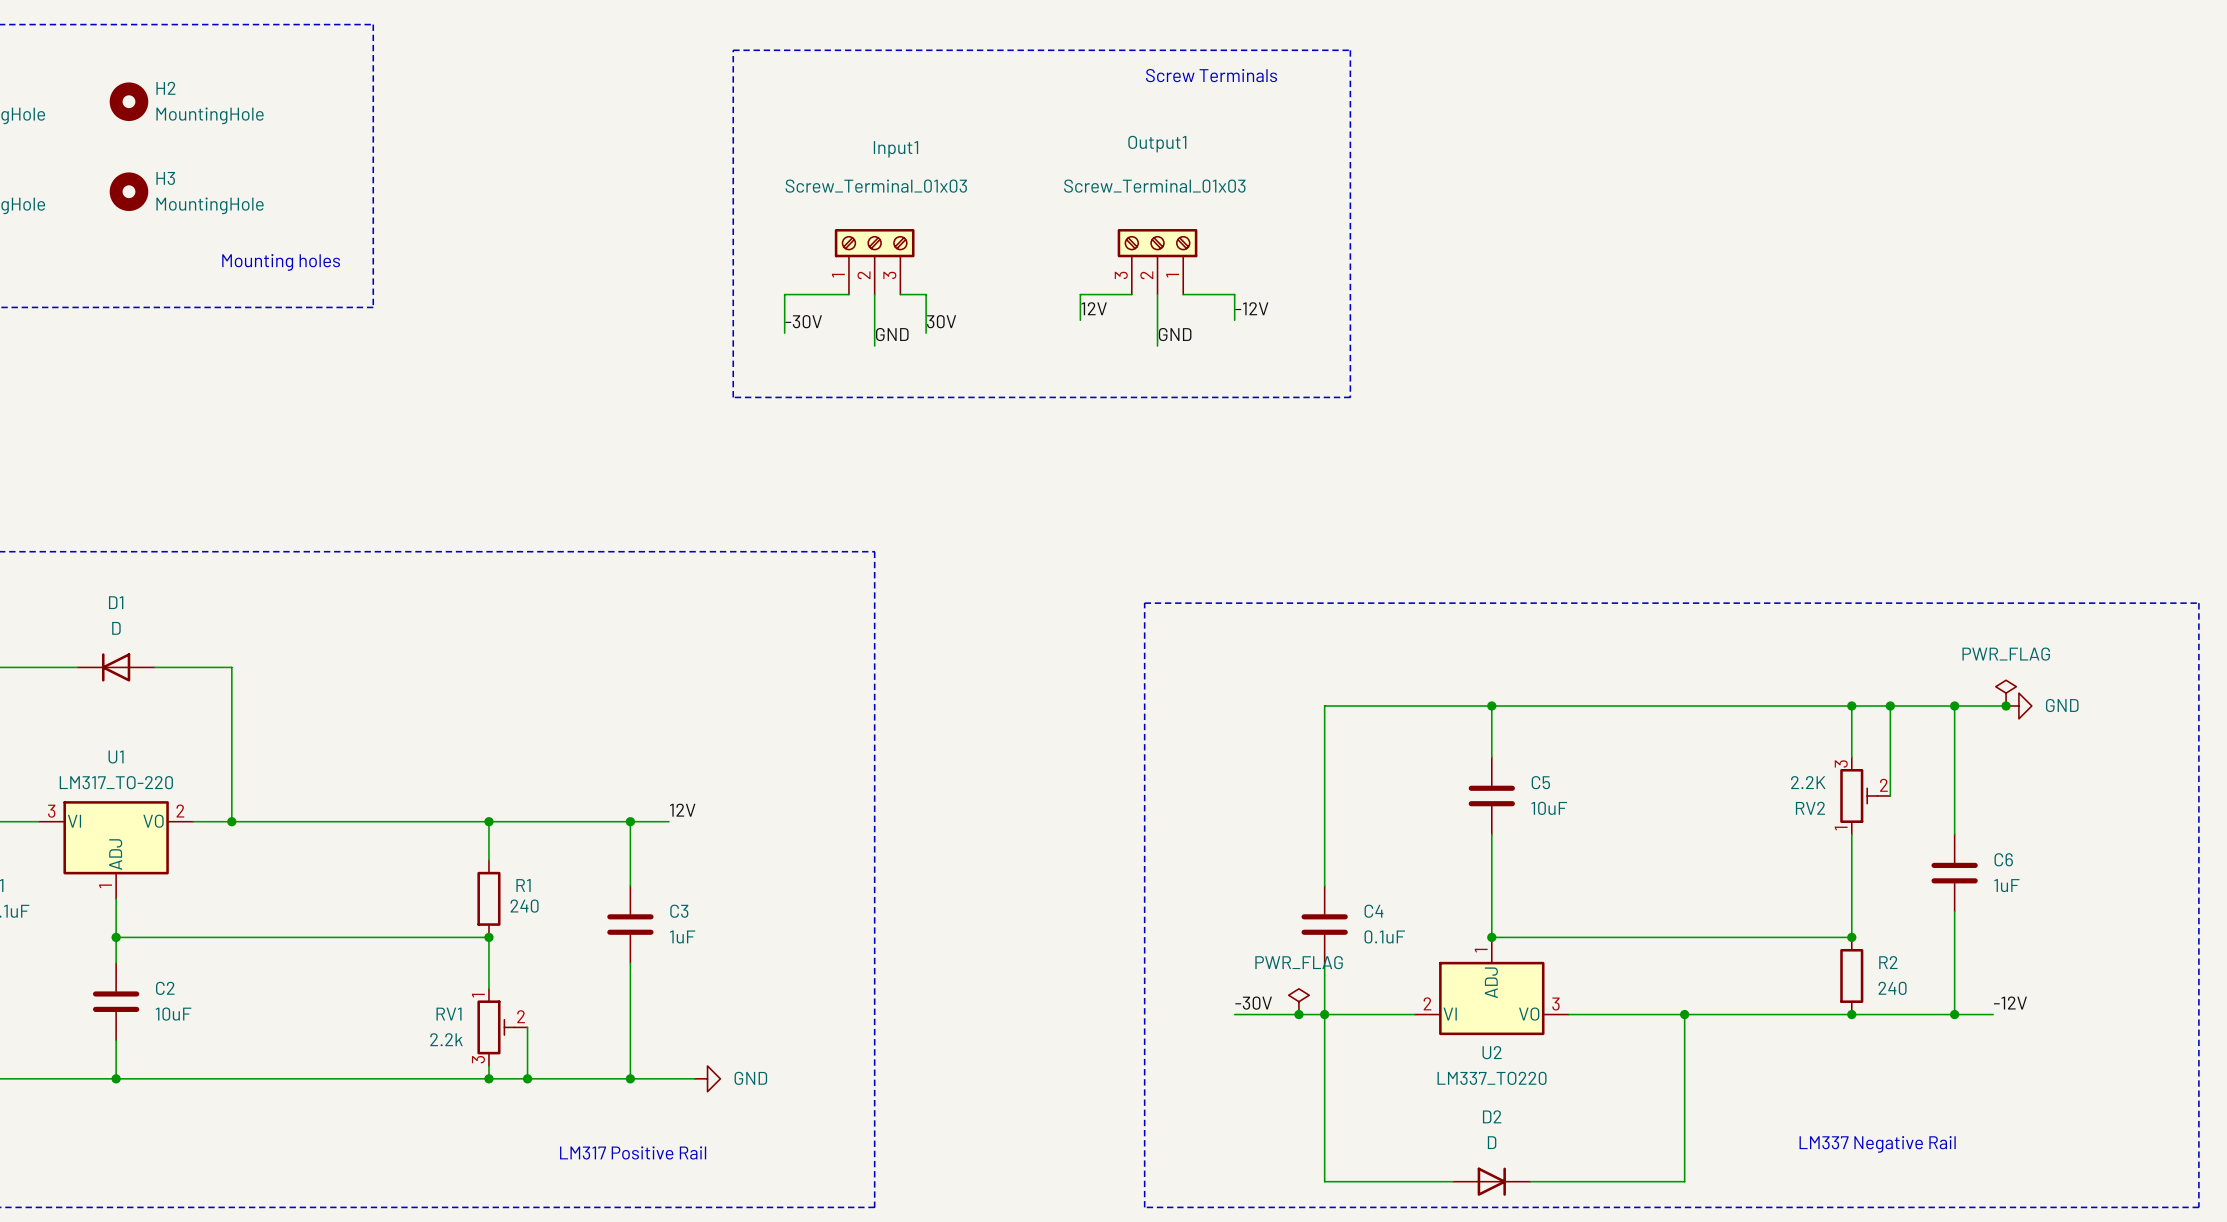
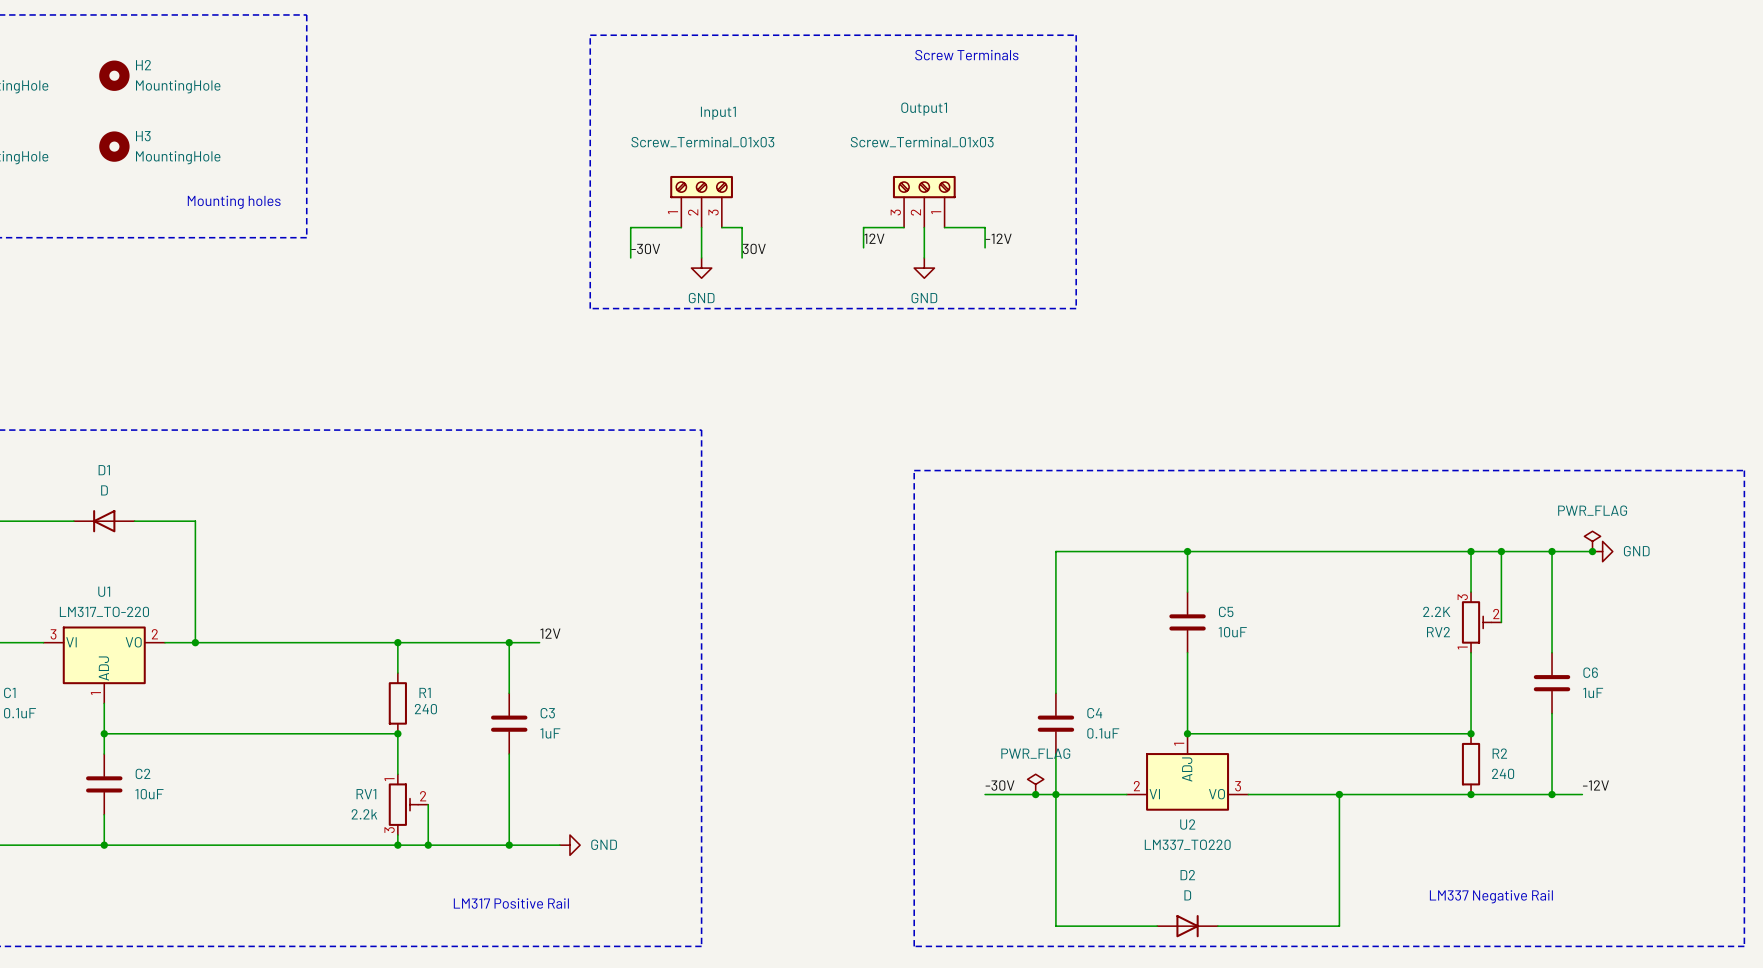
label: GND (892, 334) -> none
label: GND (1175, 334) -> none
power symbol: none -> GND (701, 268)
power symbol: none -> GND (924, 268)

